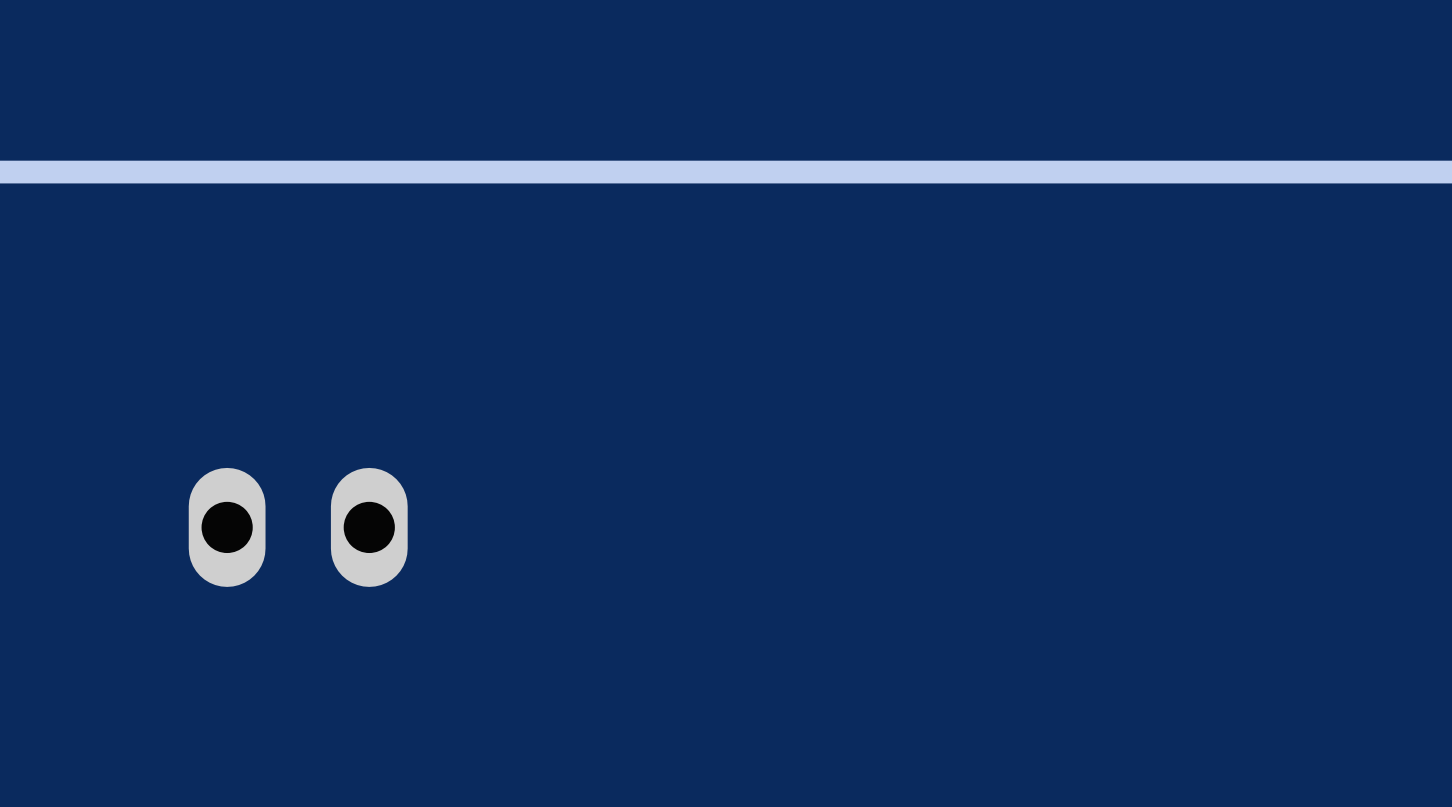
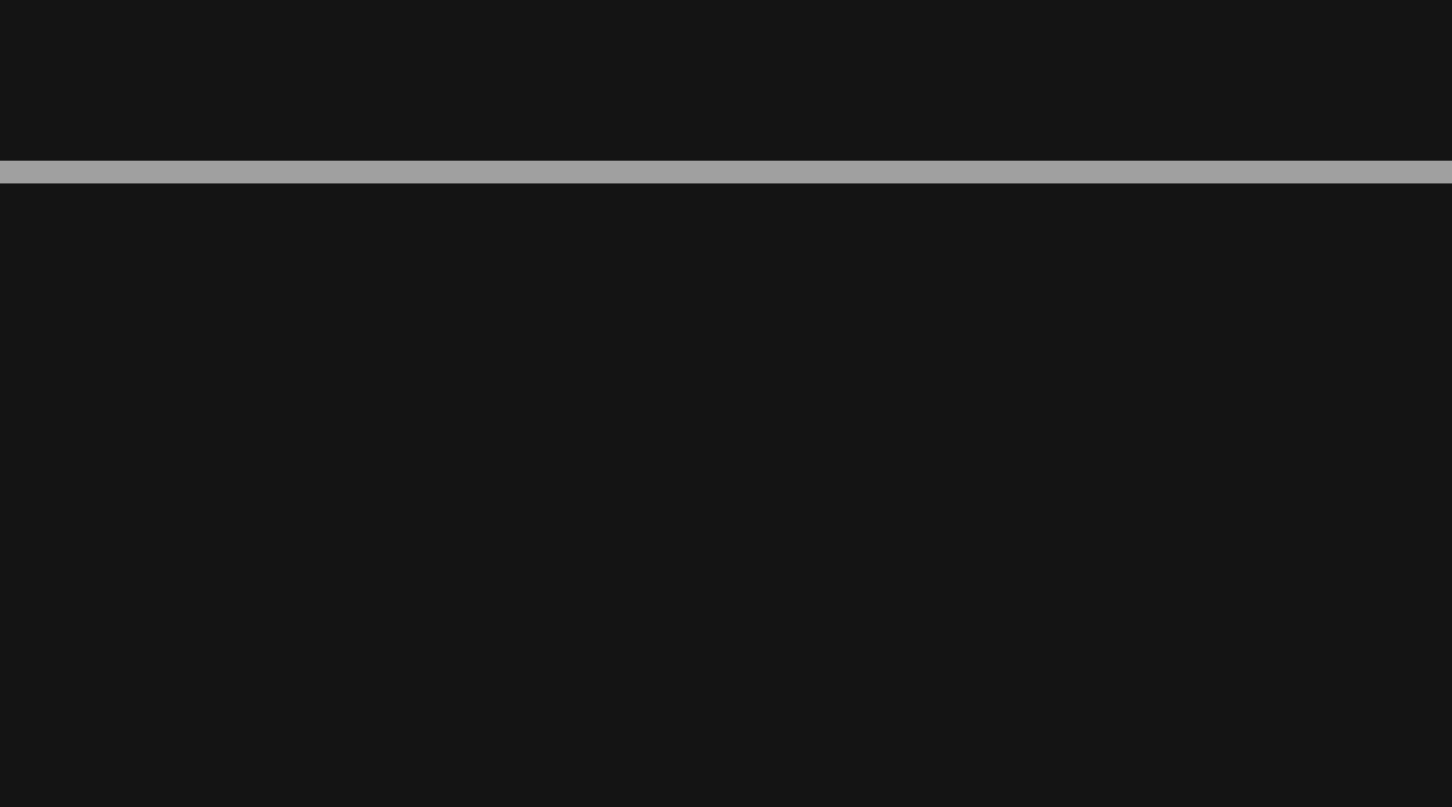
part: (298, 527) -> none

